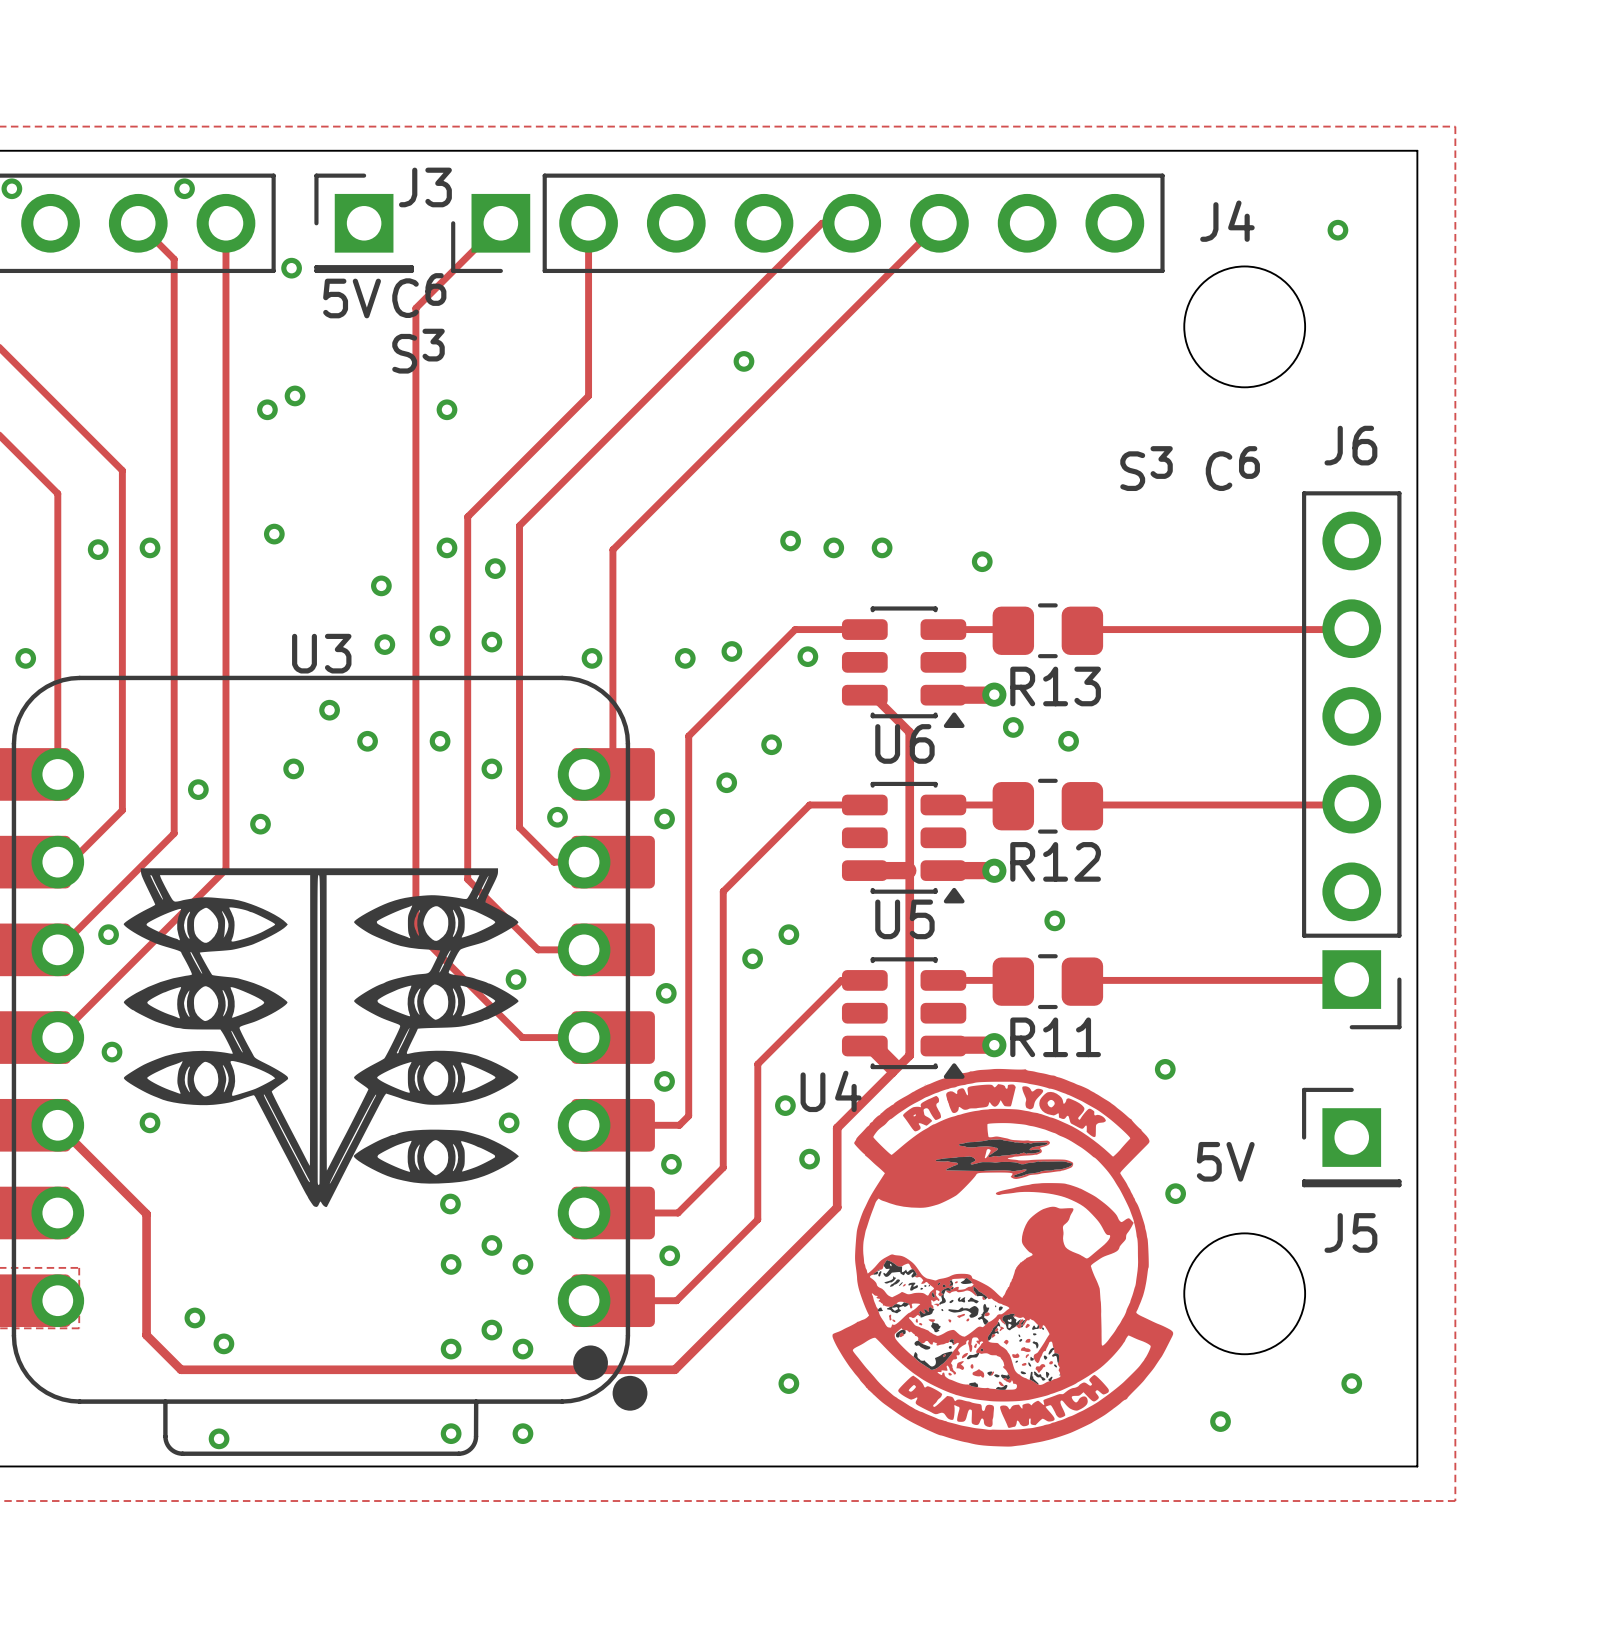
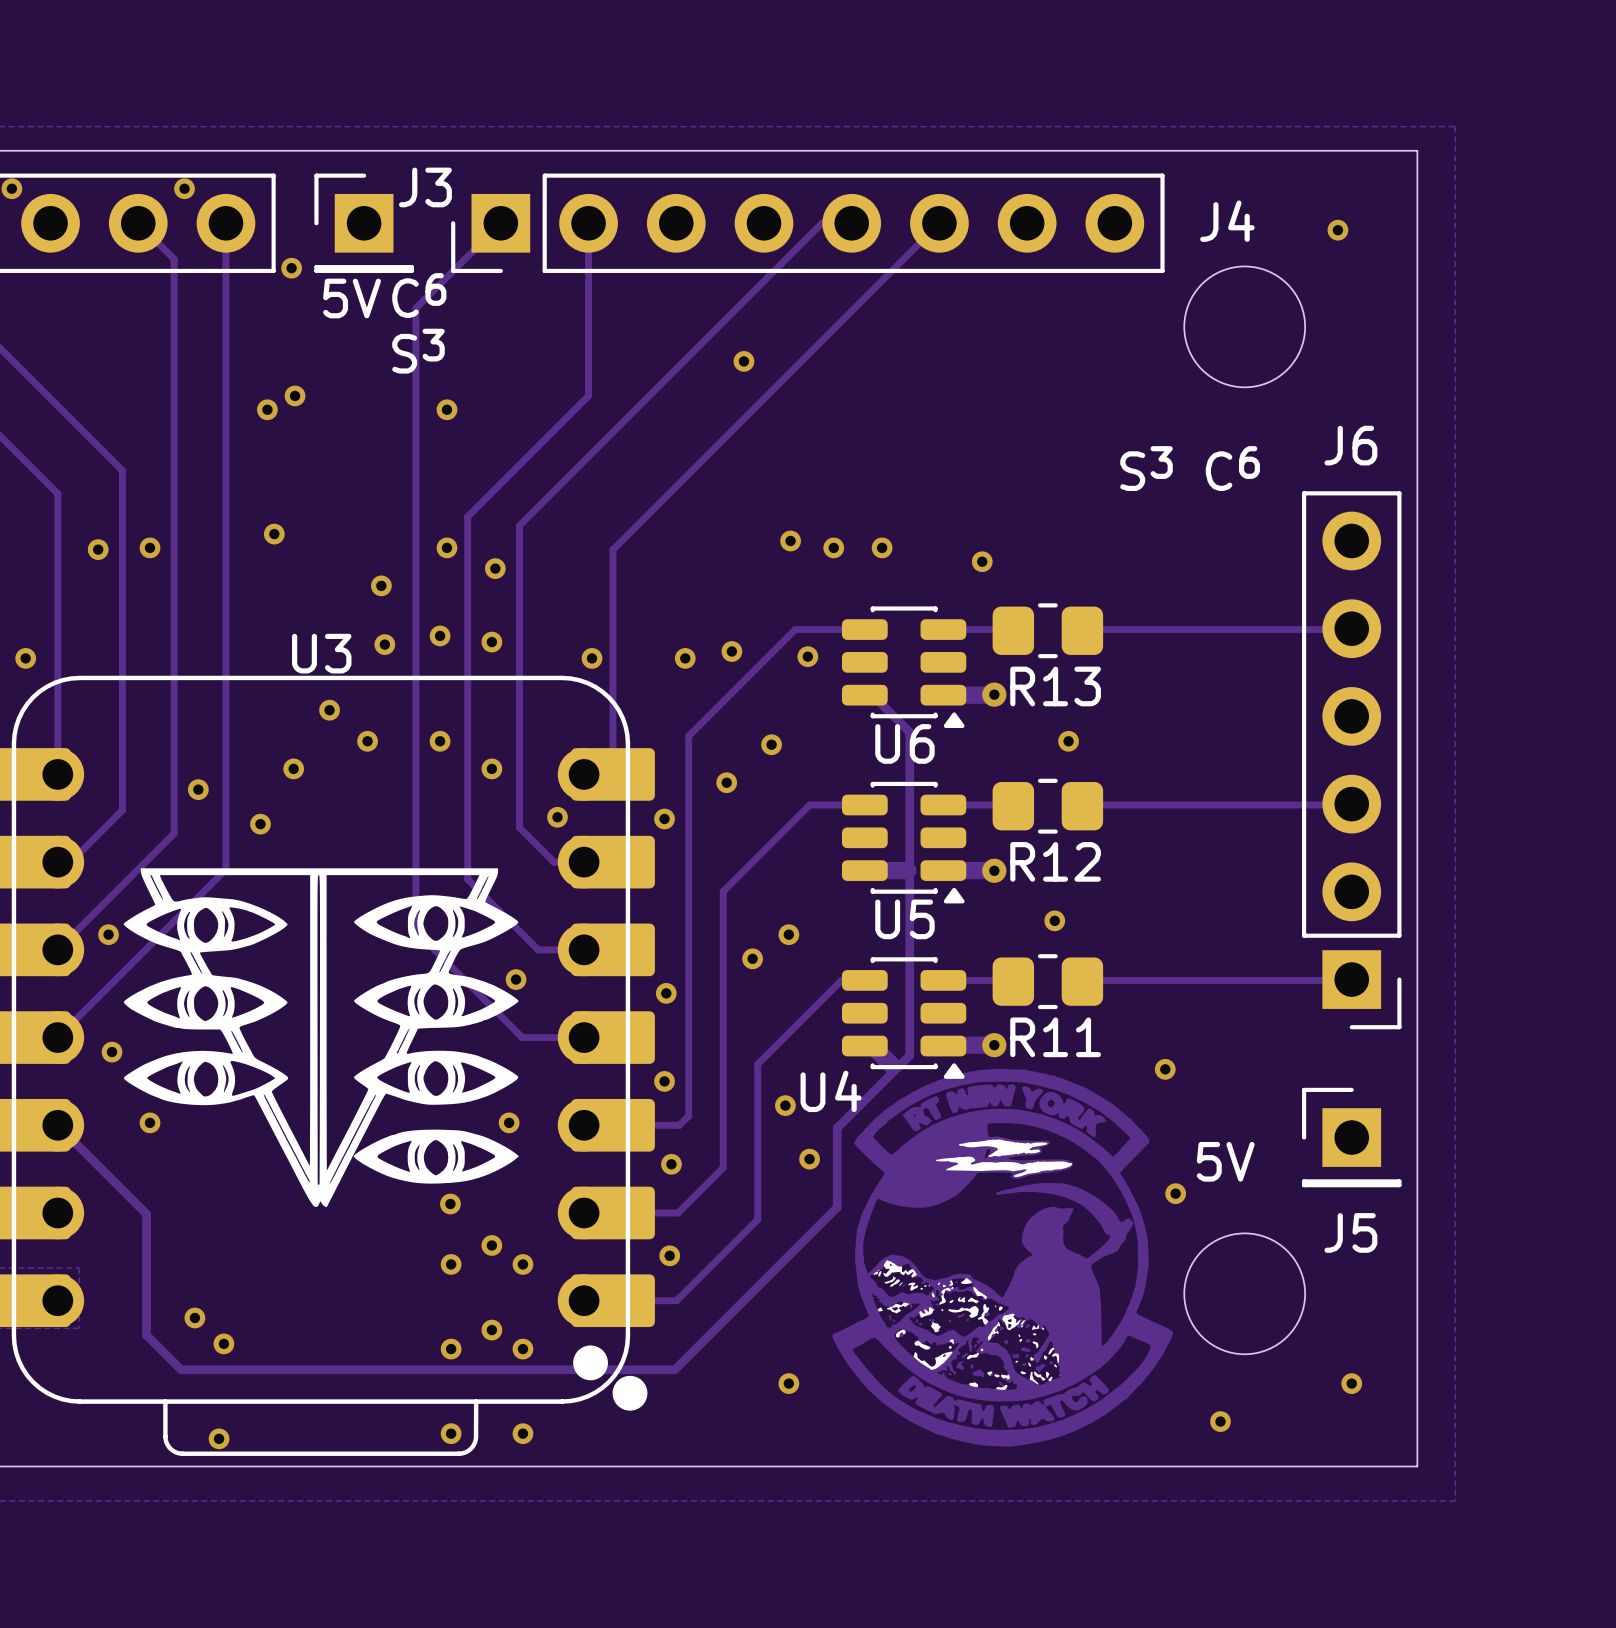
via: (1013, 727) -> none

